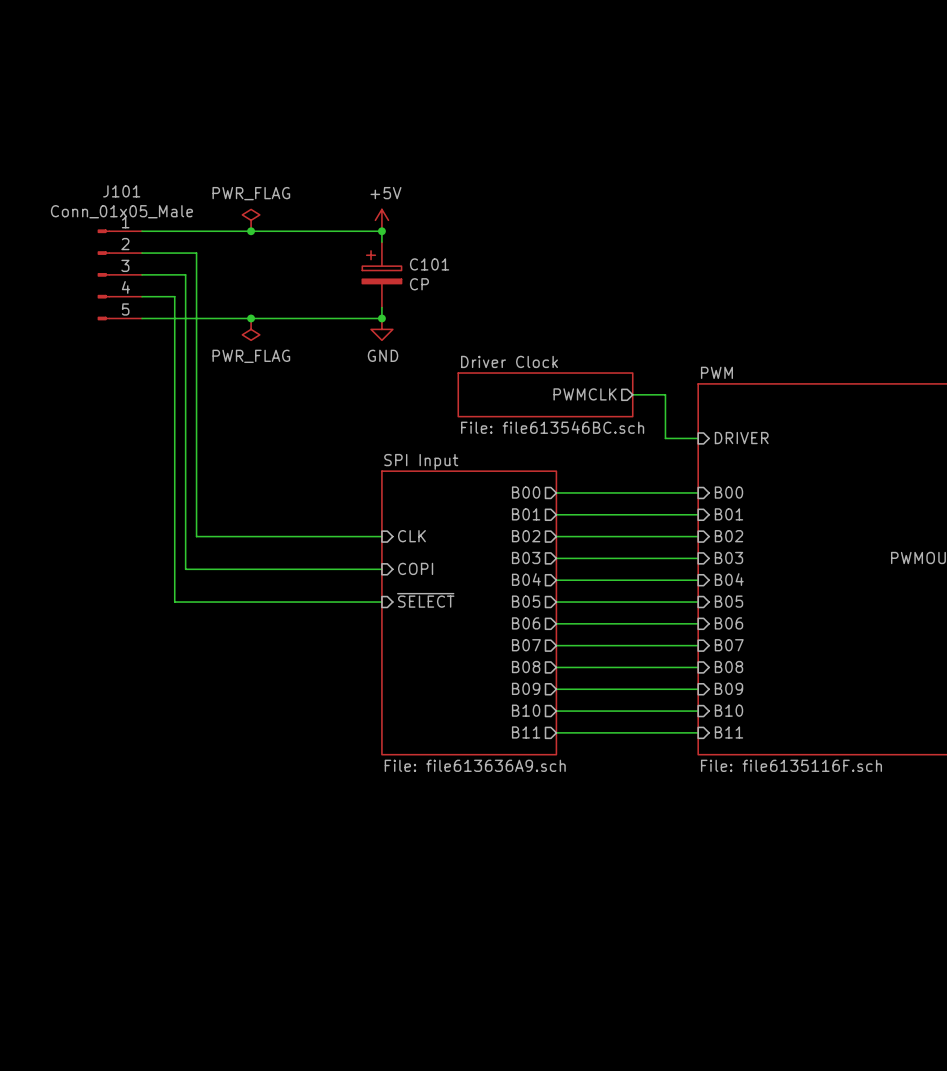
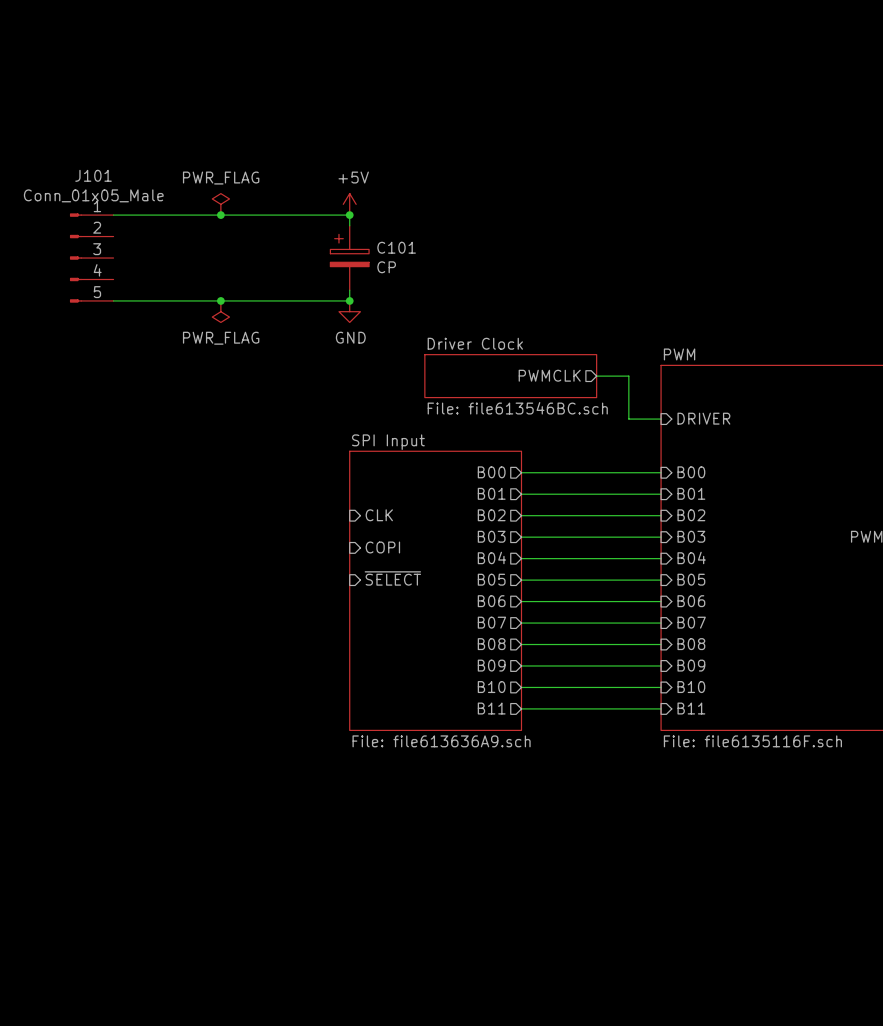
wire: (142, 253) (196, 253) (196, 536) (381, 536) -> none
wire: (142, 274) (185, 274) (185, 569) (381, 569) -> none
wire: (142, 296) (174, 296) (174, 602) (381, 602) -> none

